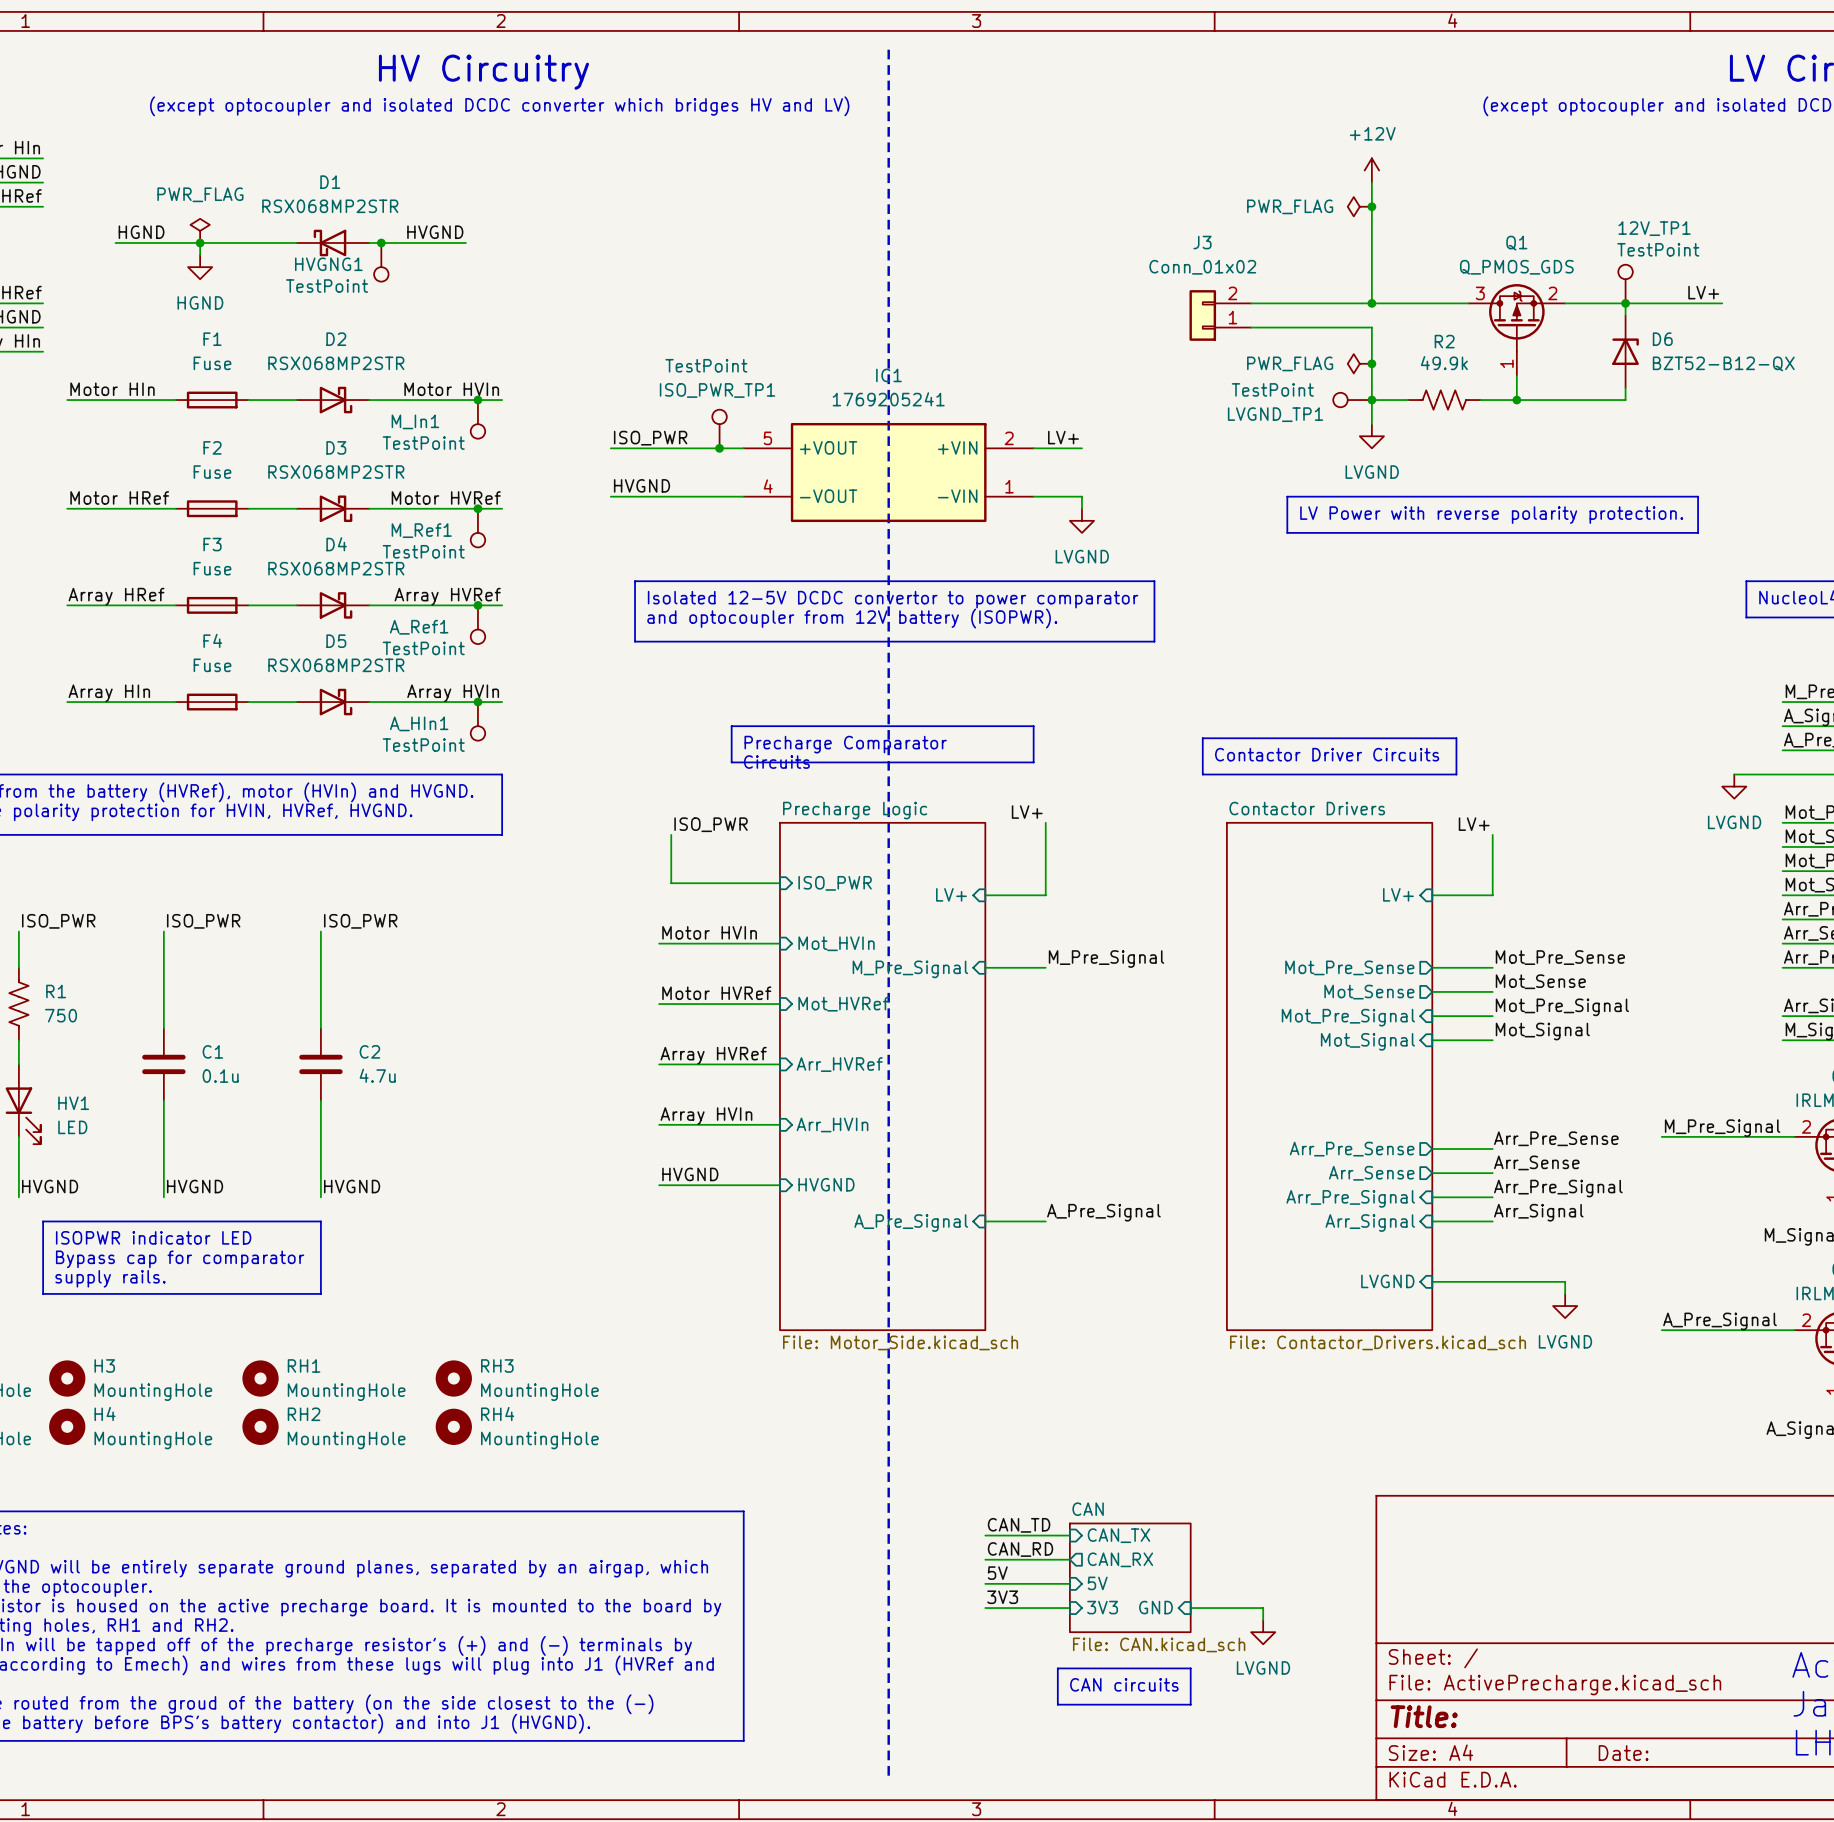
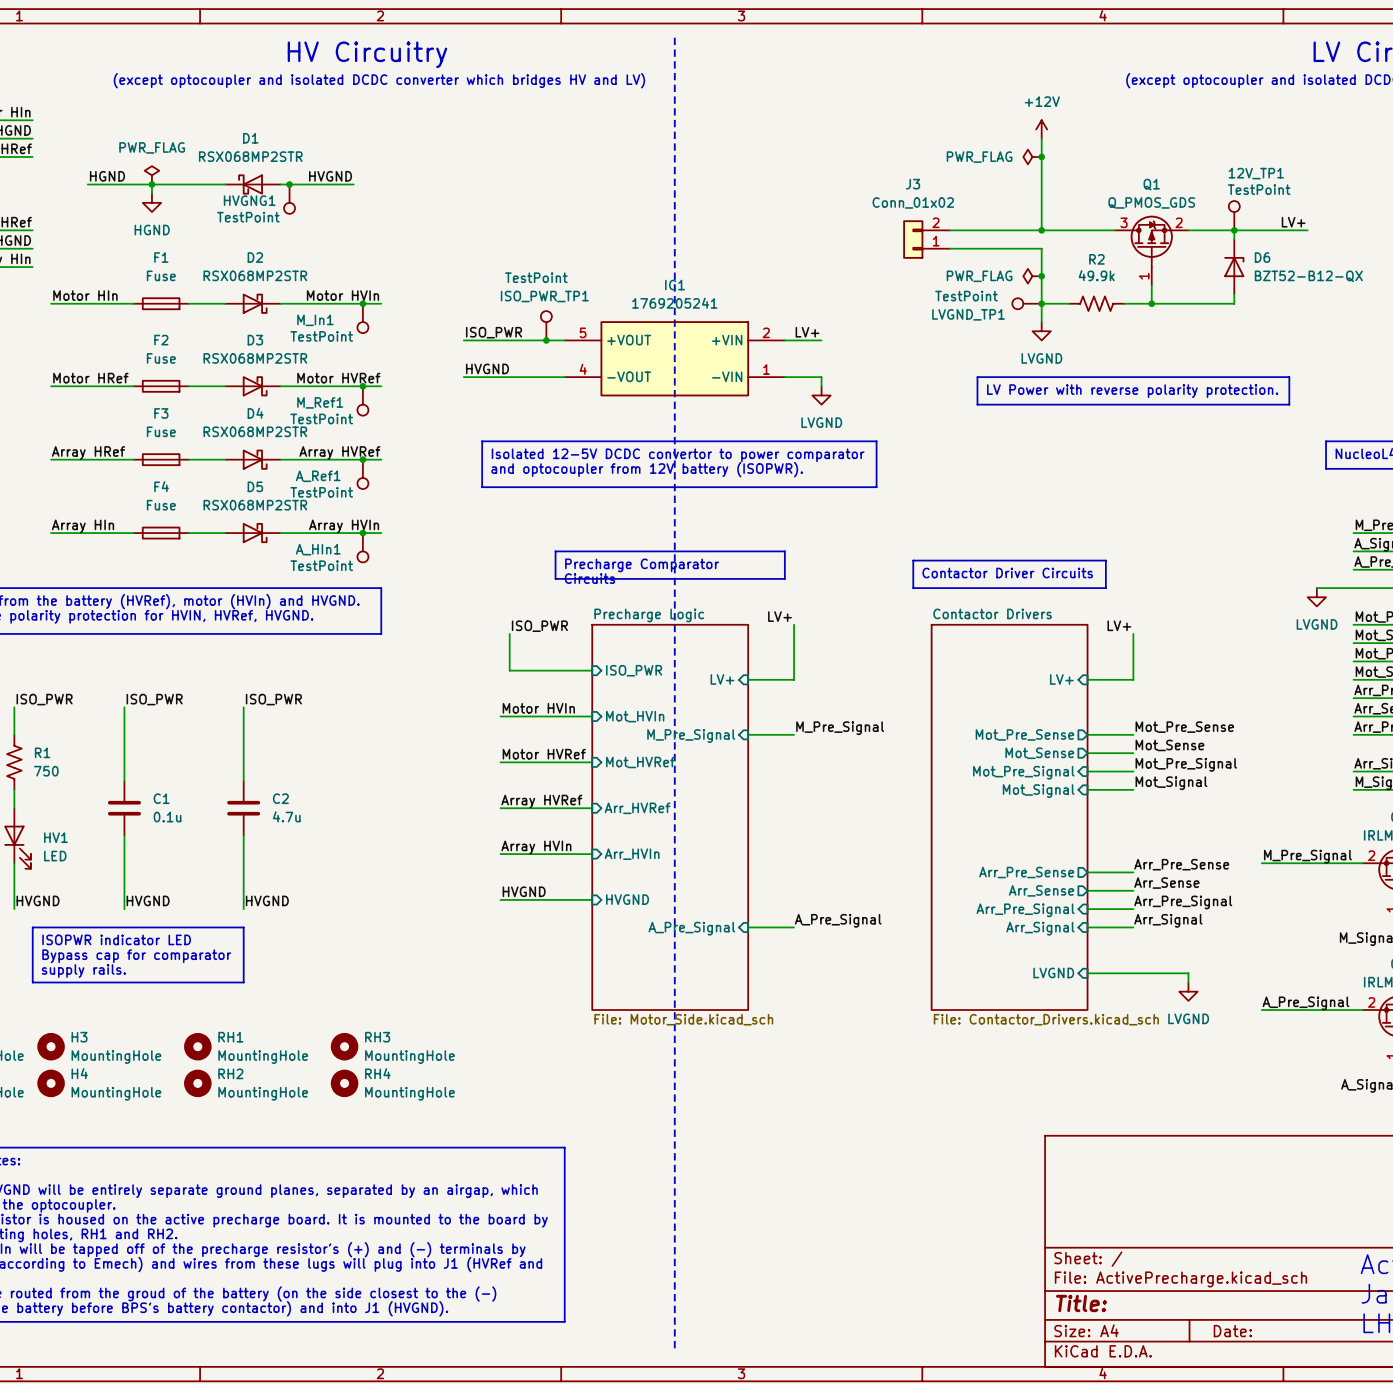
label: CAN_TD (1019, 1525) -> none
wire: (985, 1535) (1069, 1535) -> none
sheet pin: CAN_TX (1118, 1535) -> none
label: CAN_RD (1020, 1549) -> none
wire: (985, 1559) (1069, 1559) -> none
sheet pin: CAN_RX (1120, 1559) -> none
label: 5V (997, 1573) -> none
sheet CAN: File: CAN.kicad_sch (1130, 1577) -> none
wire: (985, 1583) (1069, 1583) -> none
sheet pin: 5V (1097, 1583) -> none
label: 3V3 (1002, 1597) -> none
sheet pin: 3V3 (1102, 1607) -> none
sheet pin: GND (1155, 1607) -> none
wire: (985, 1608) (1069, 1608) -> none
wire: (1190, 1608) (1263, 1608) (1263, 1620) -> none
power symbol: LVGND (1263, 1632) -> none
line: (1057, 1668) (1190, 1668) (1190, 1704) (1057, 1704) (1057, 1668) -> none
text: CAN circuits (1124, 1684) -> none

